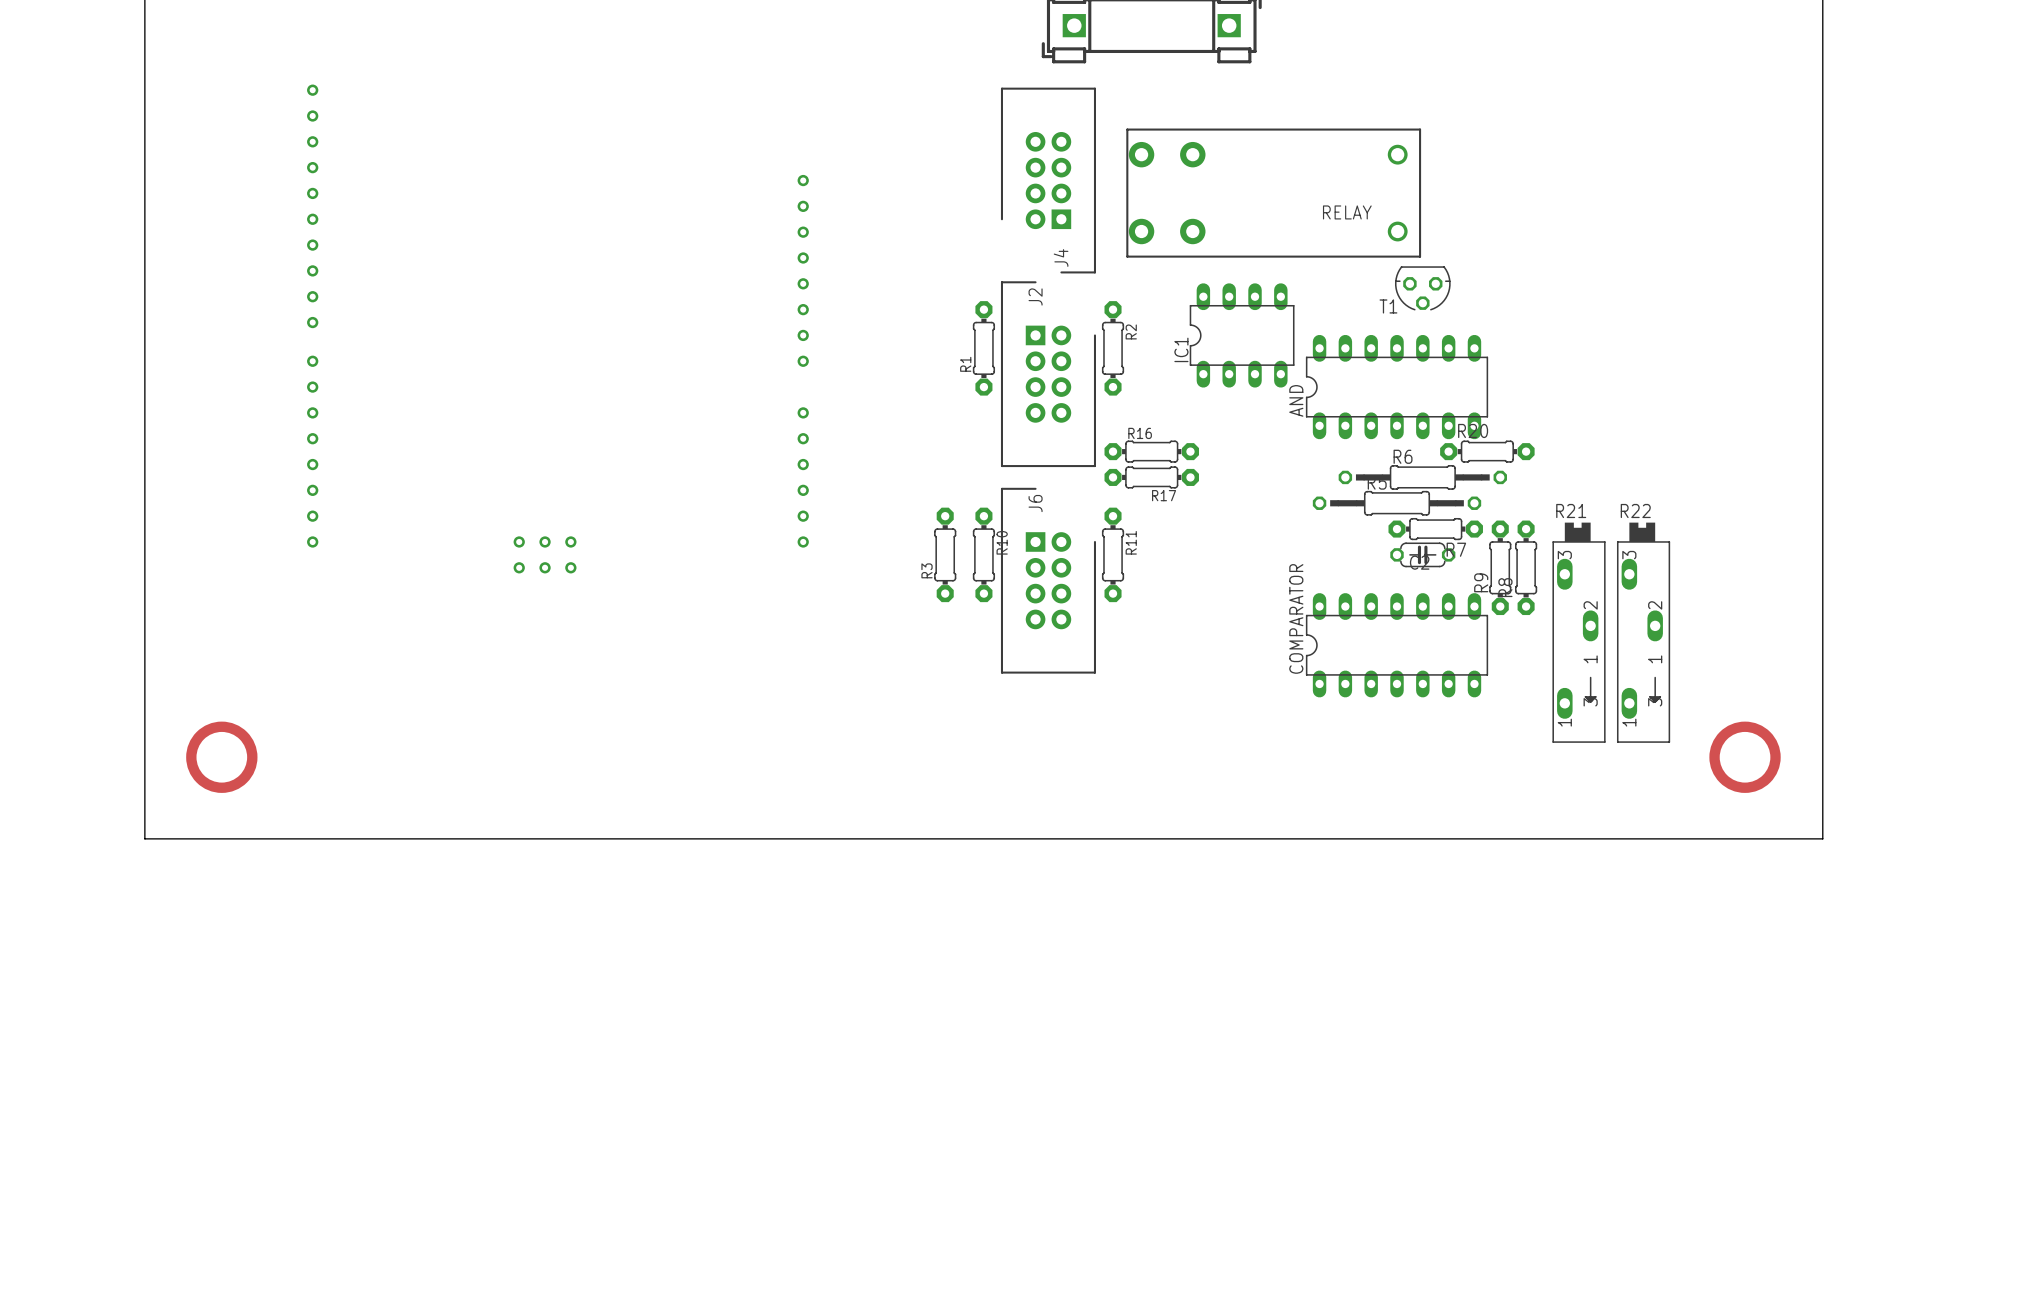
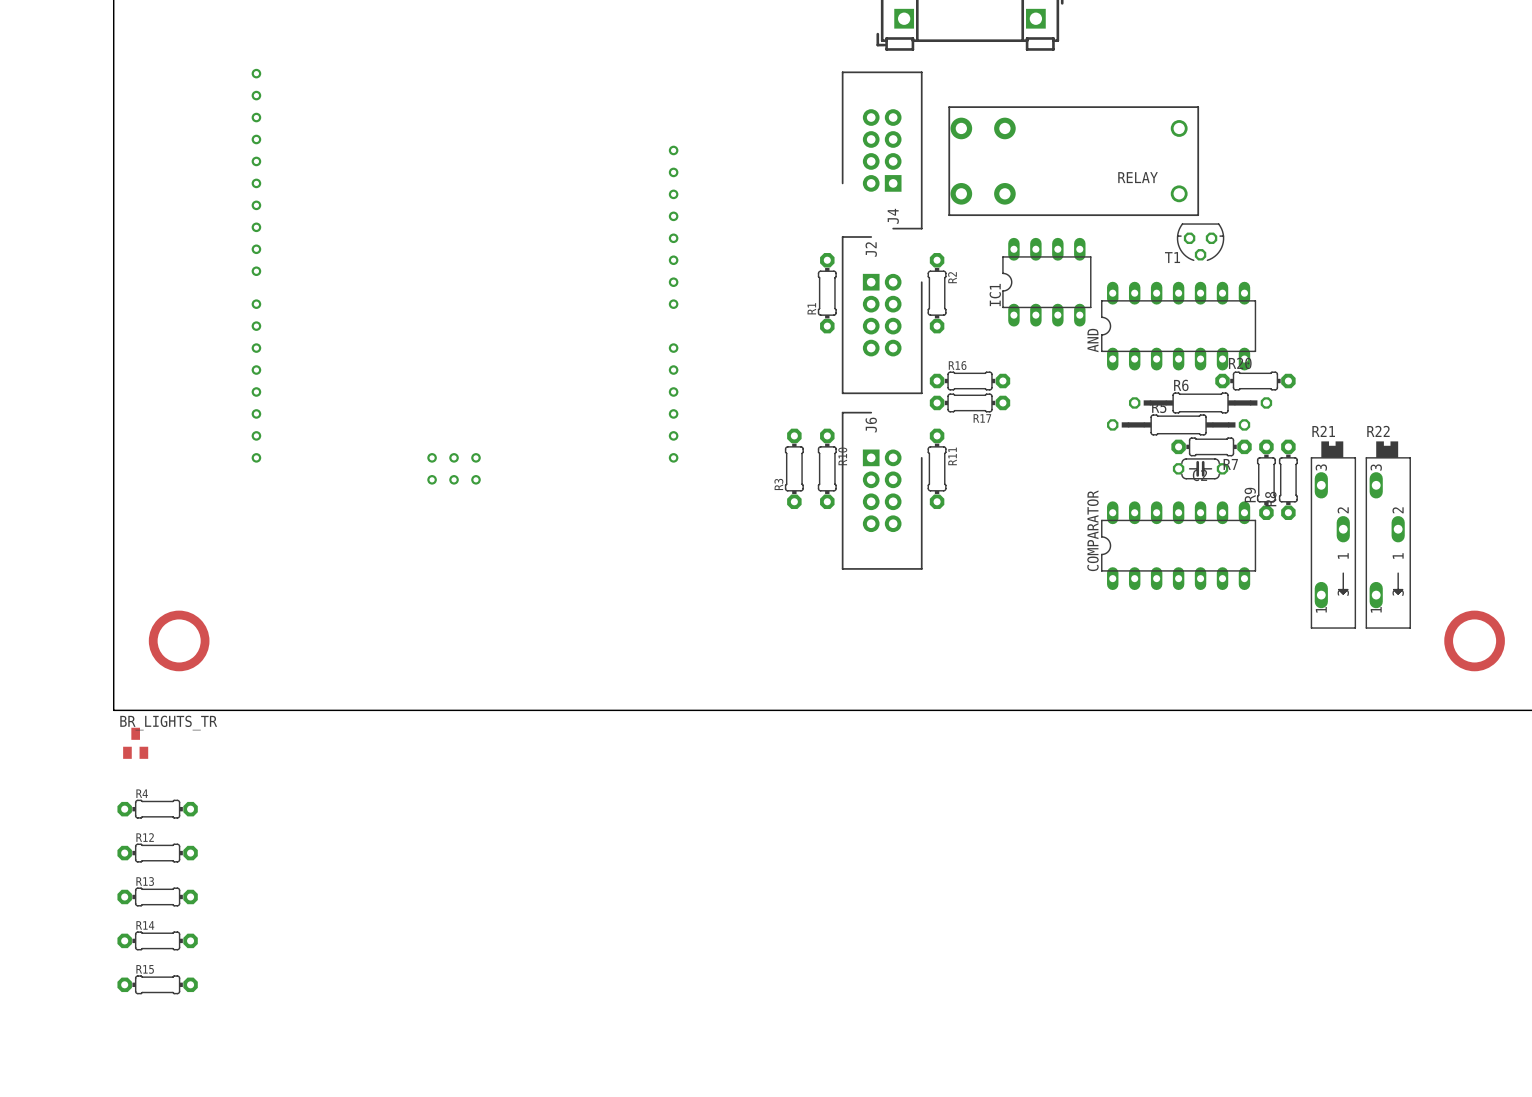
BR_LIGHTS_TR: none -> (135, 743)
R4: none -> (157, 809)
R12: none -> (157, 853)
R13: none -> (157, 896)
R14: none -> (157, 940)
R15: none -> (157, 984)

